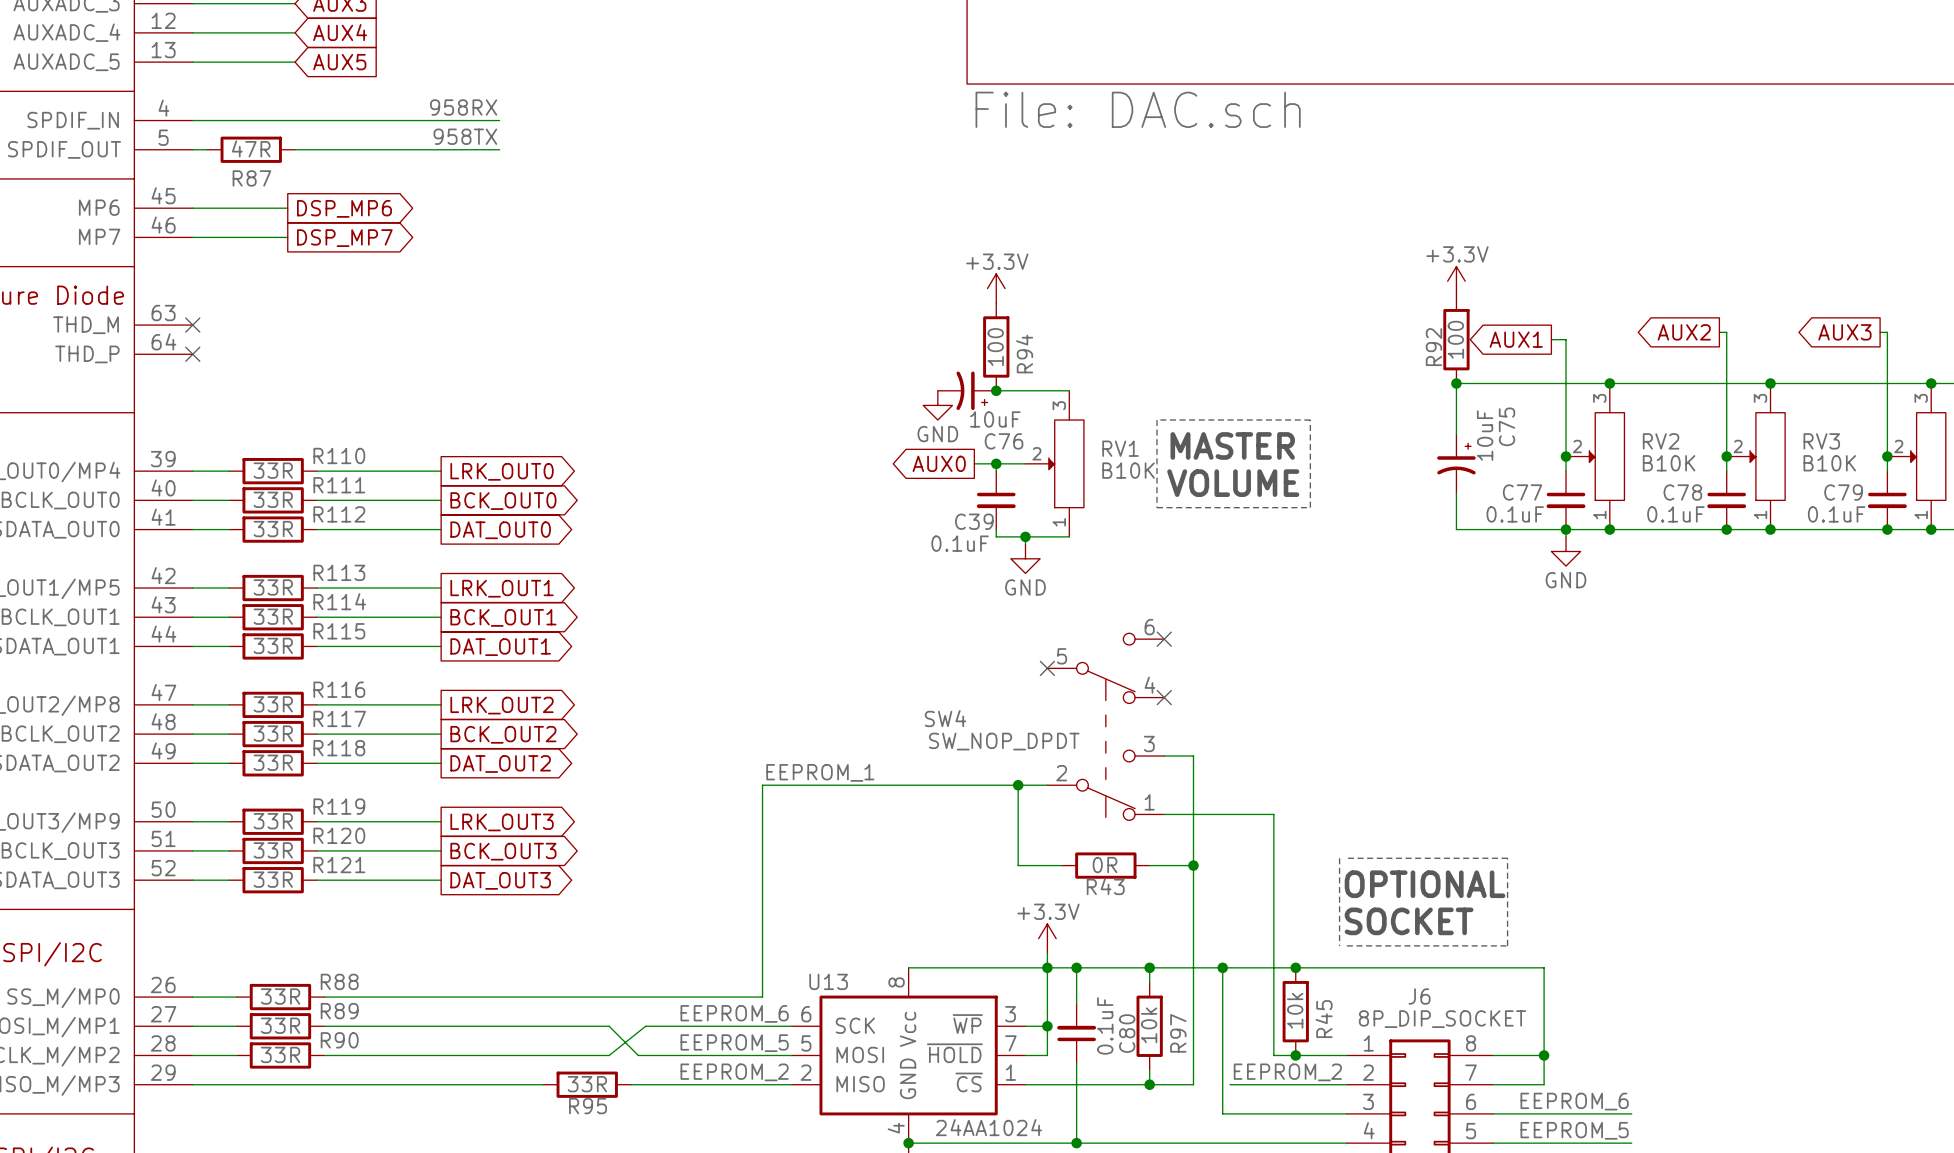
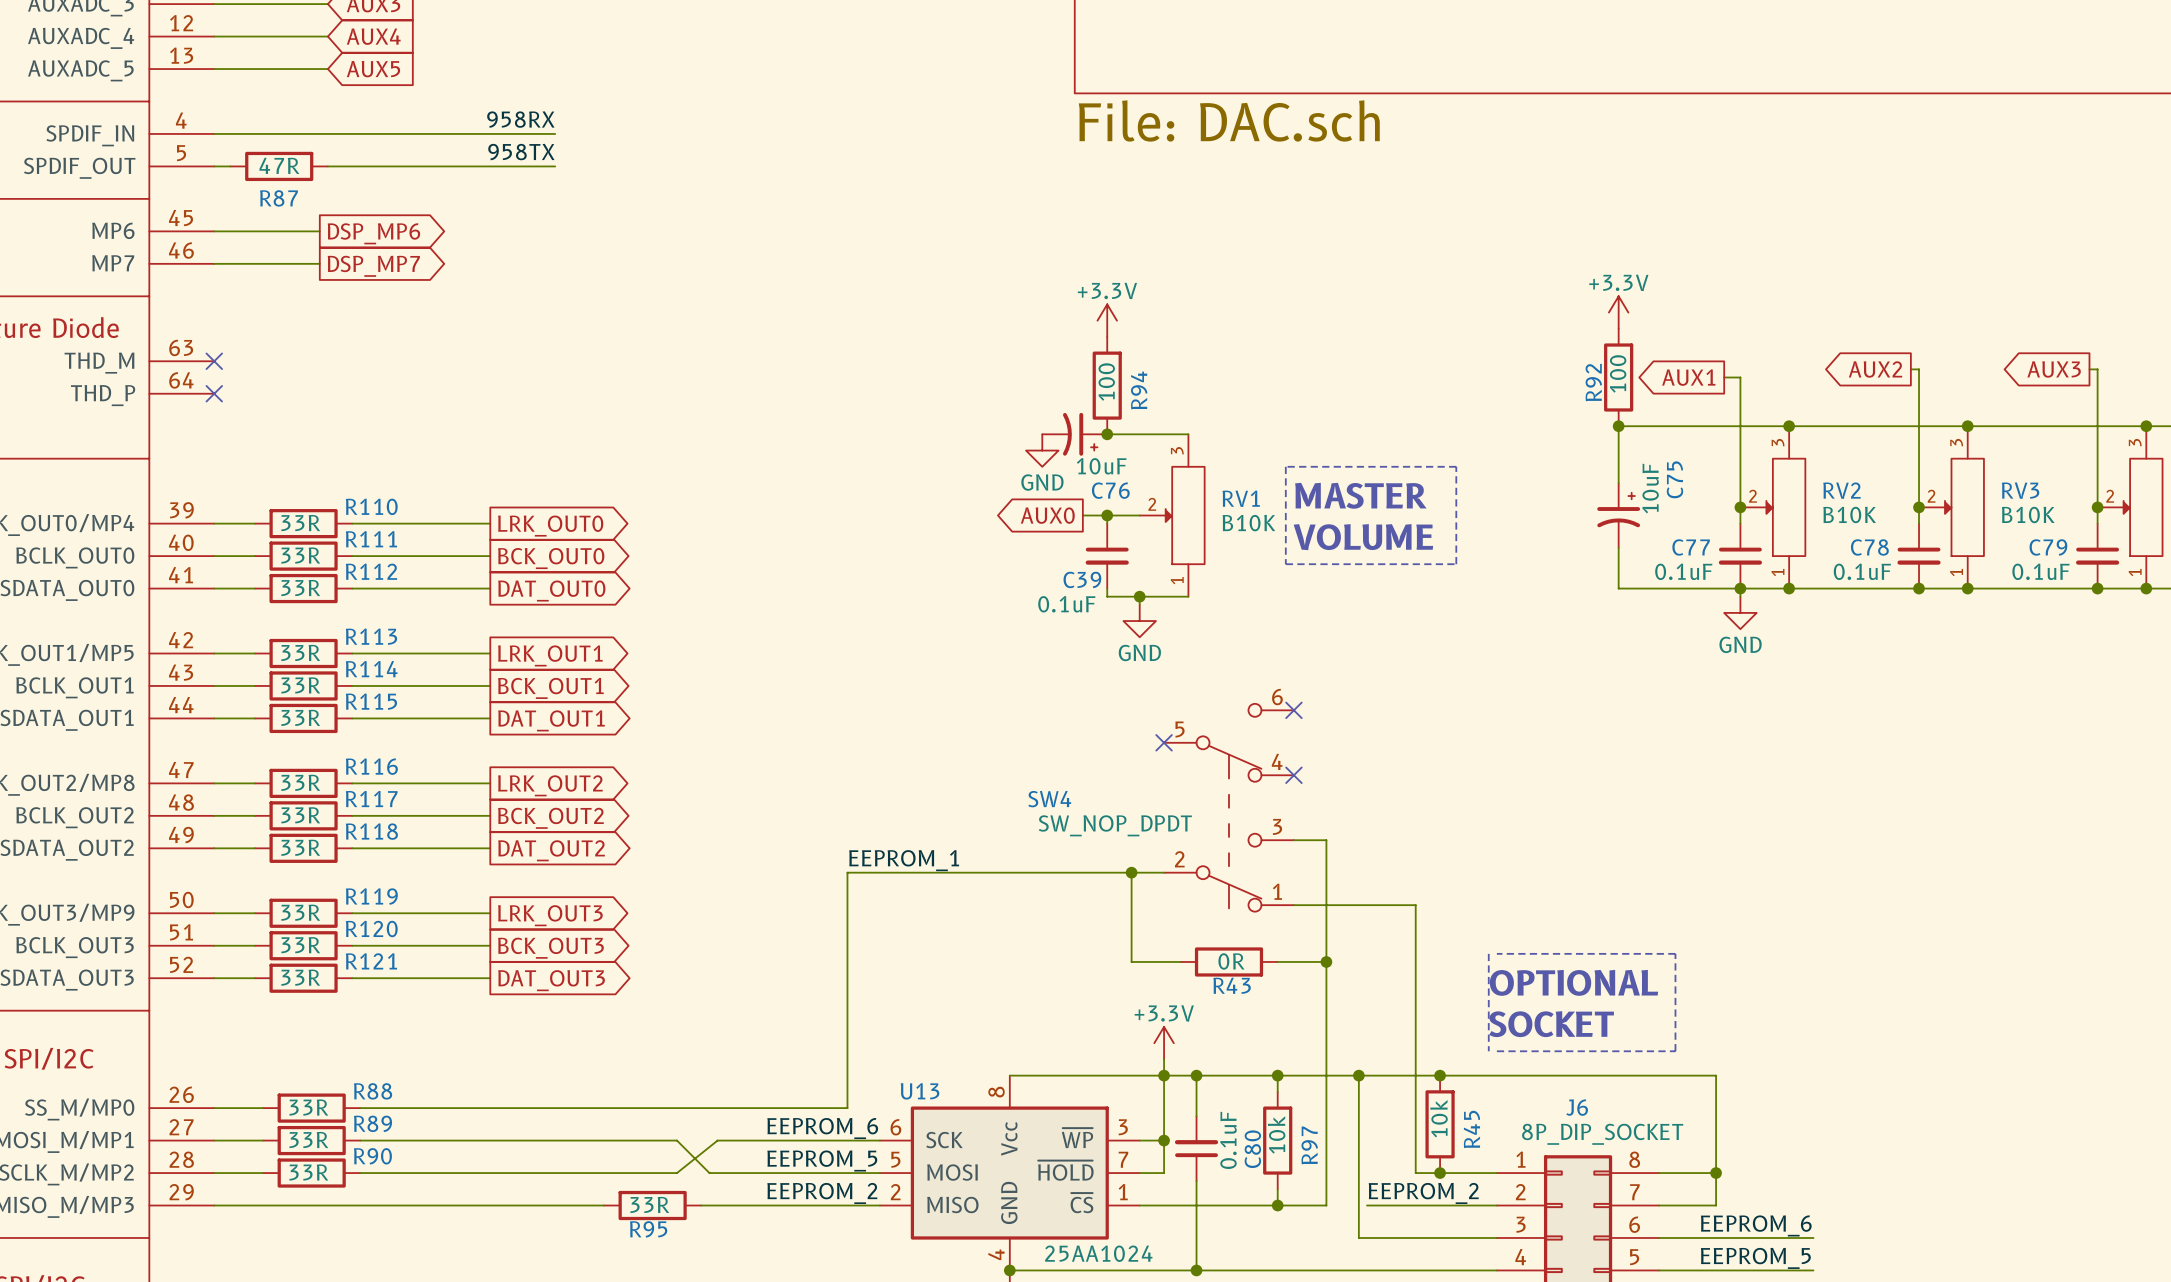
U13 value: 24AA1024 (988, 1127) -> 25AA1024 (1098, 1253)

